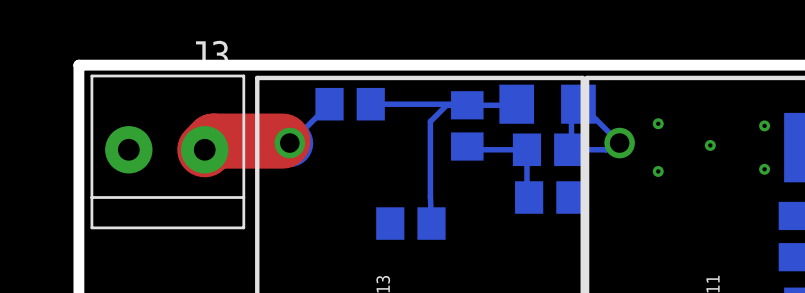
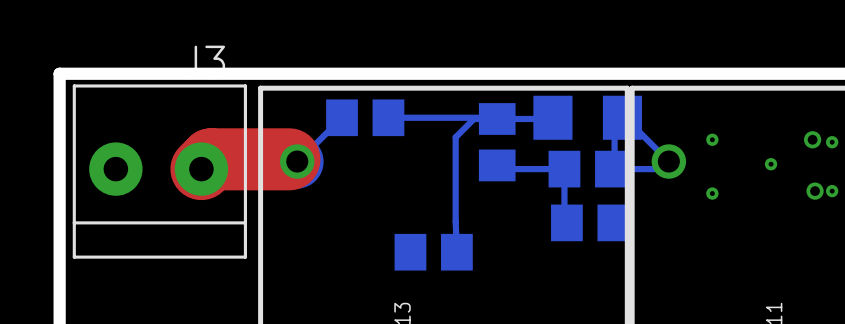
via: none -> (812, 139)
via: none -> (815, 191)

